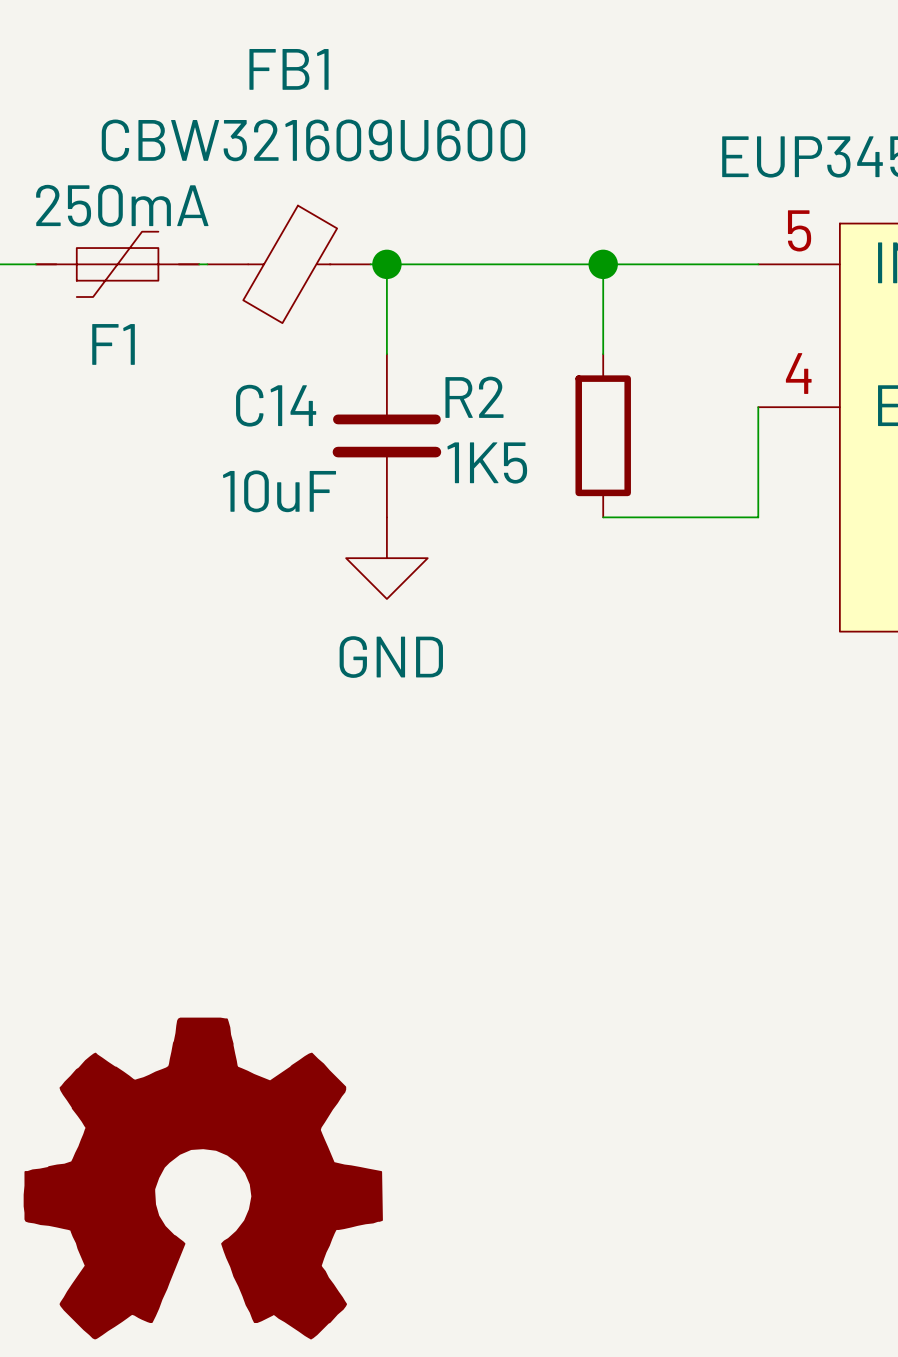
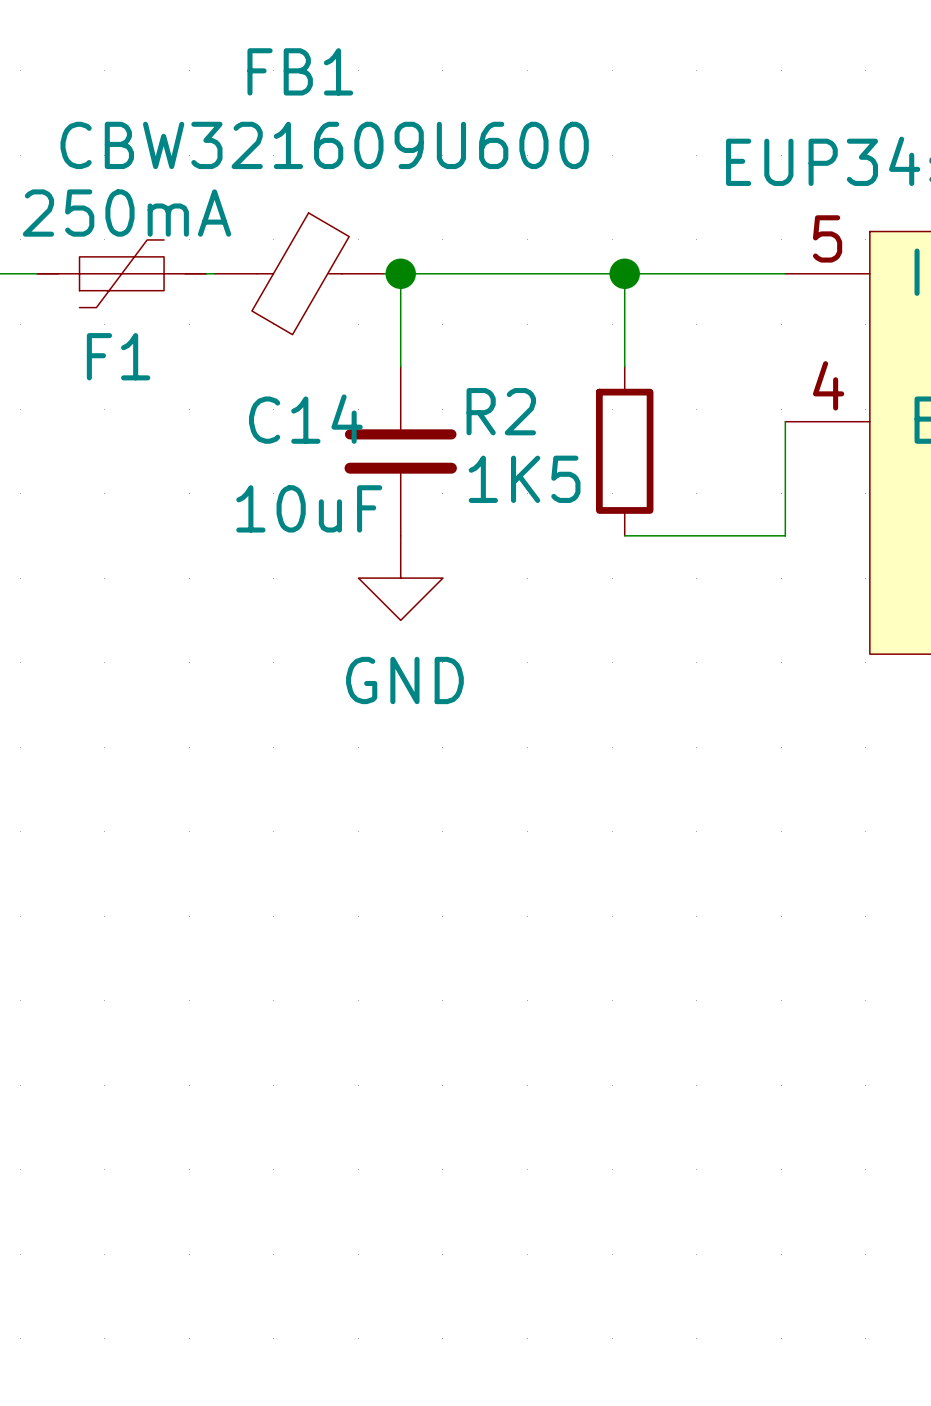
part: (203, 1178) -> none

